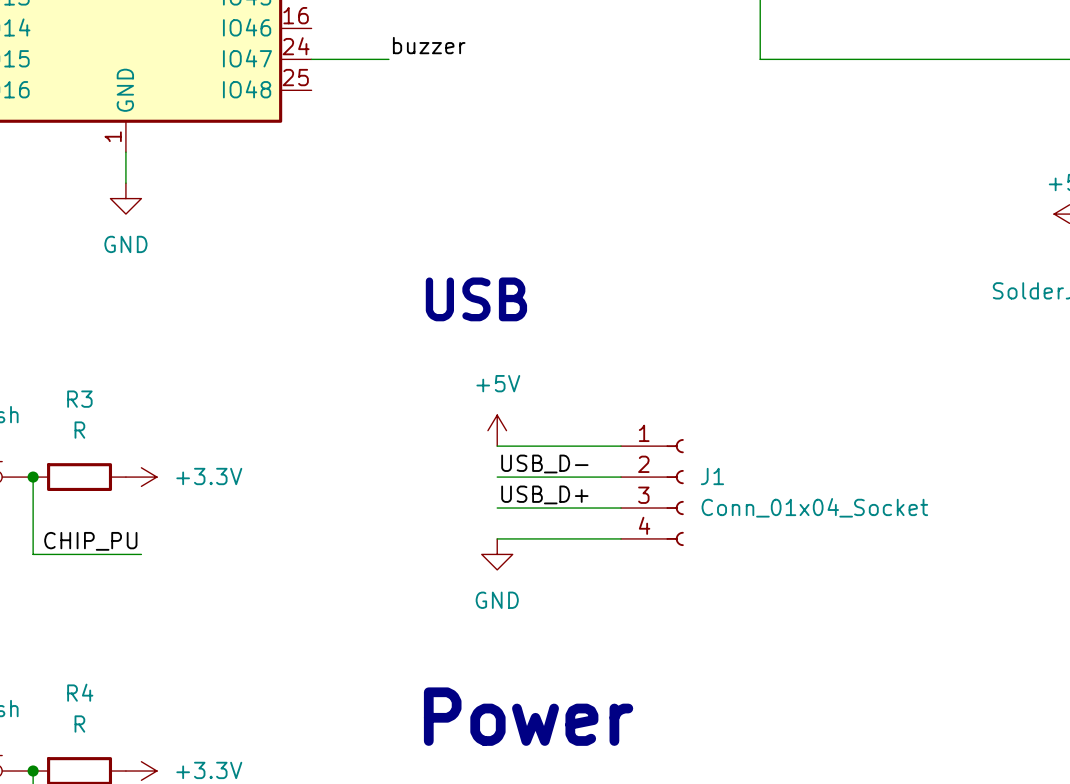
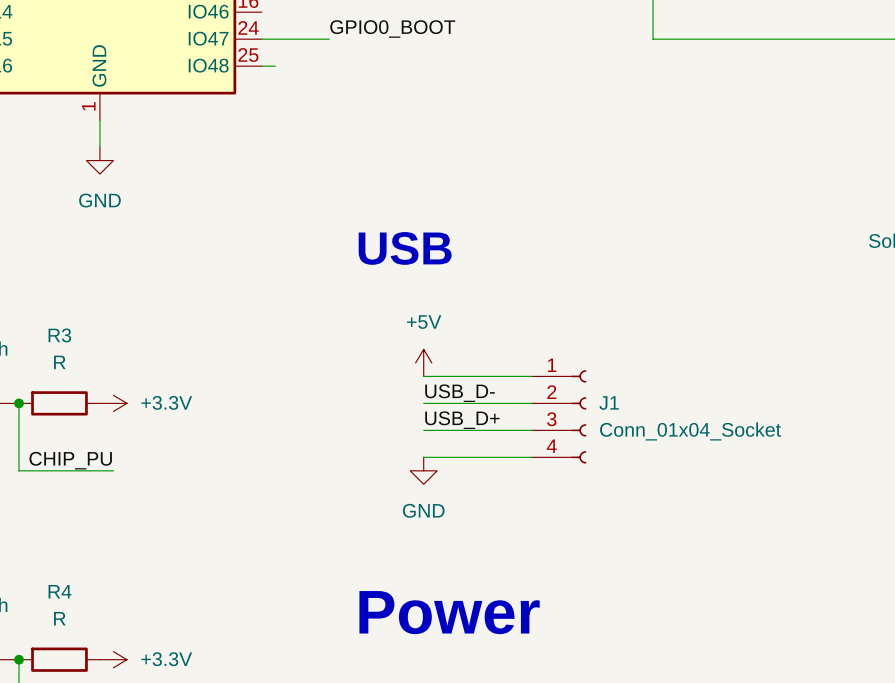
label: buzzer (429, 45) -> GPIO0_BOOT (392, 28)
wire: none -> (261, 66) (275, 66)

